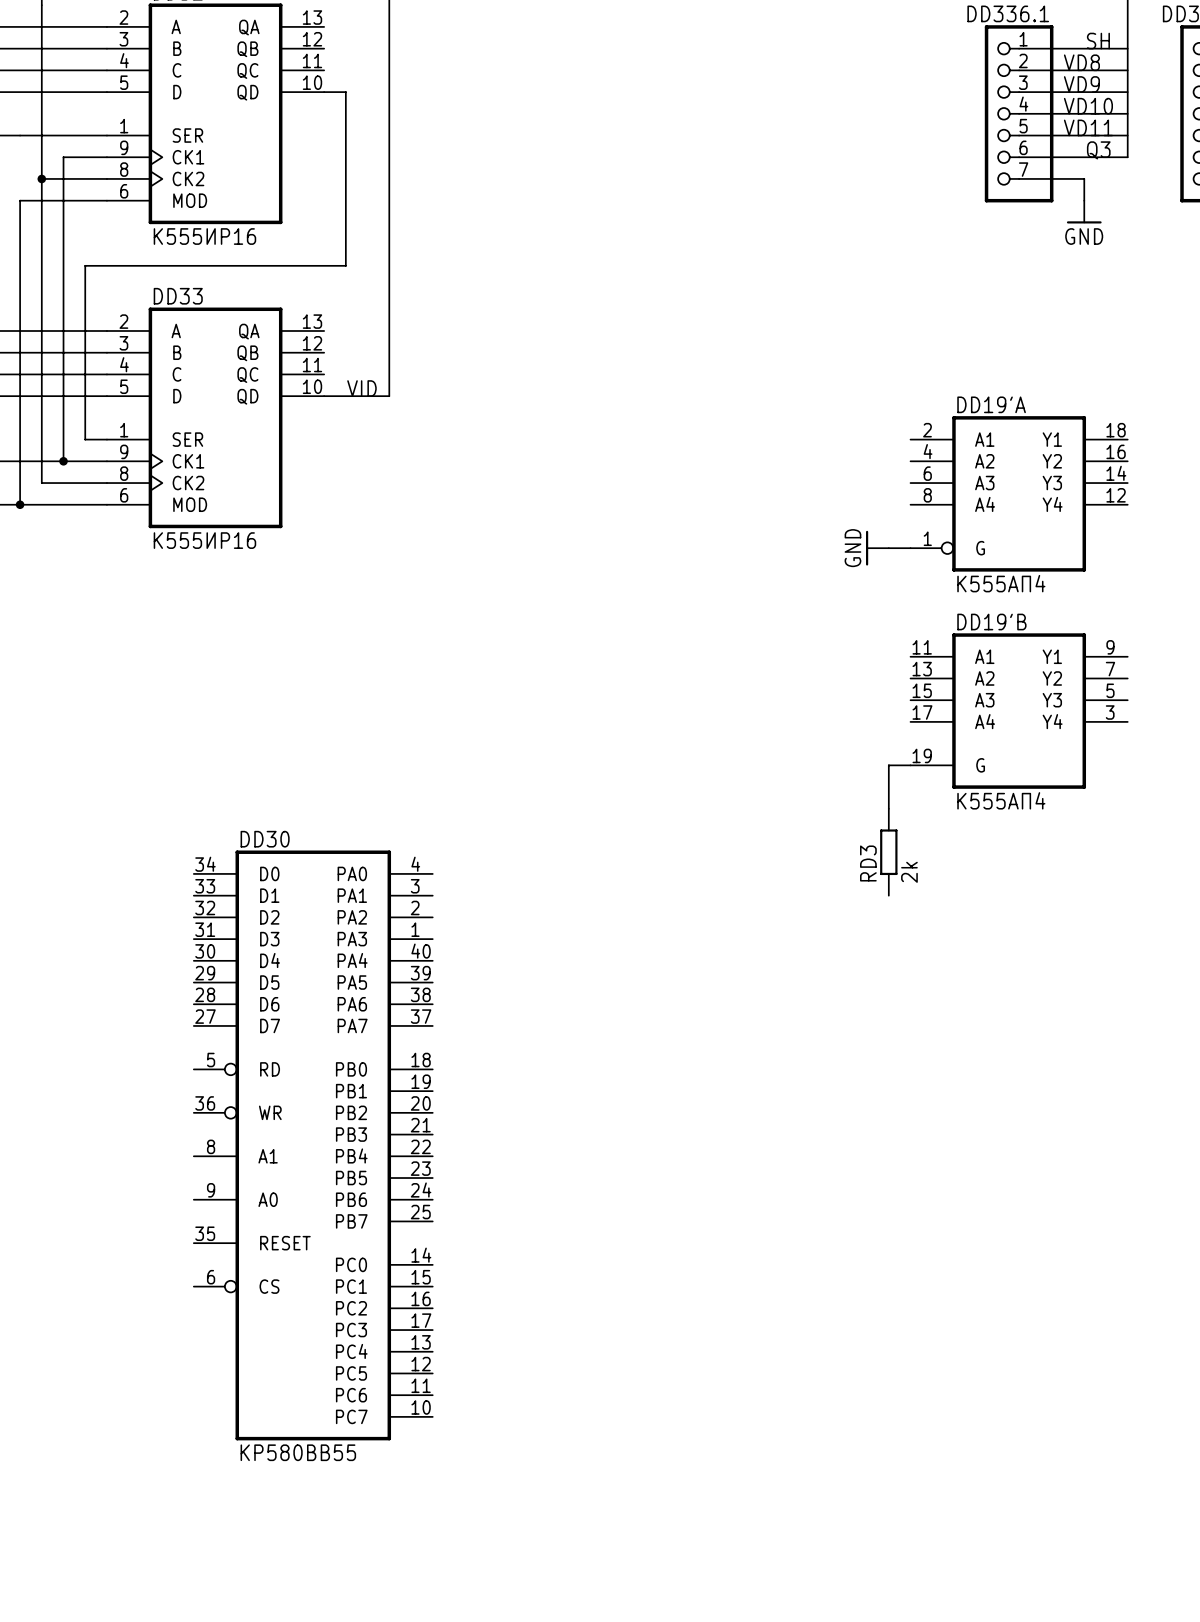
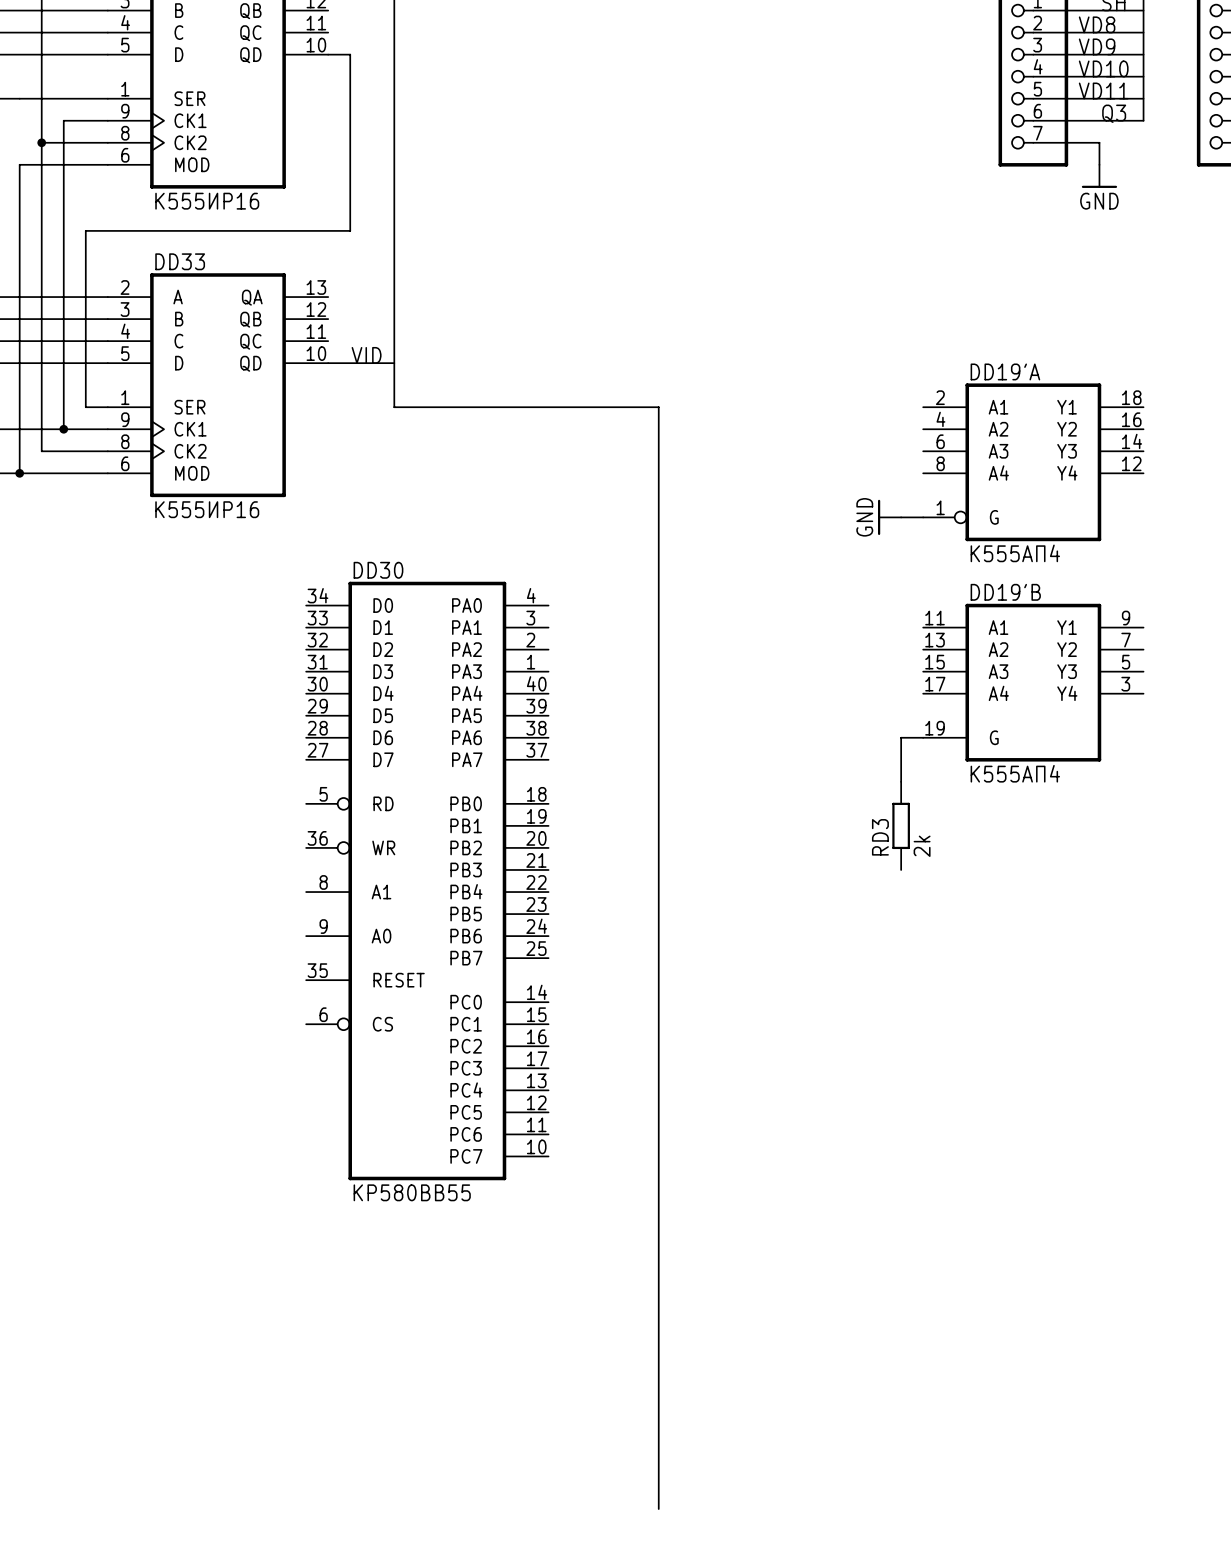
bus: none -> (394, 363) (394, 407) (658, 407) (658, 1509)
DD30 position: (313, 1145) -> (427, 881)

